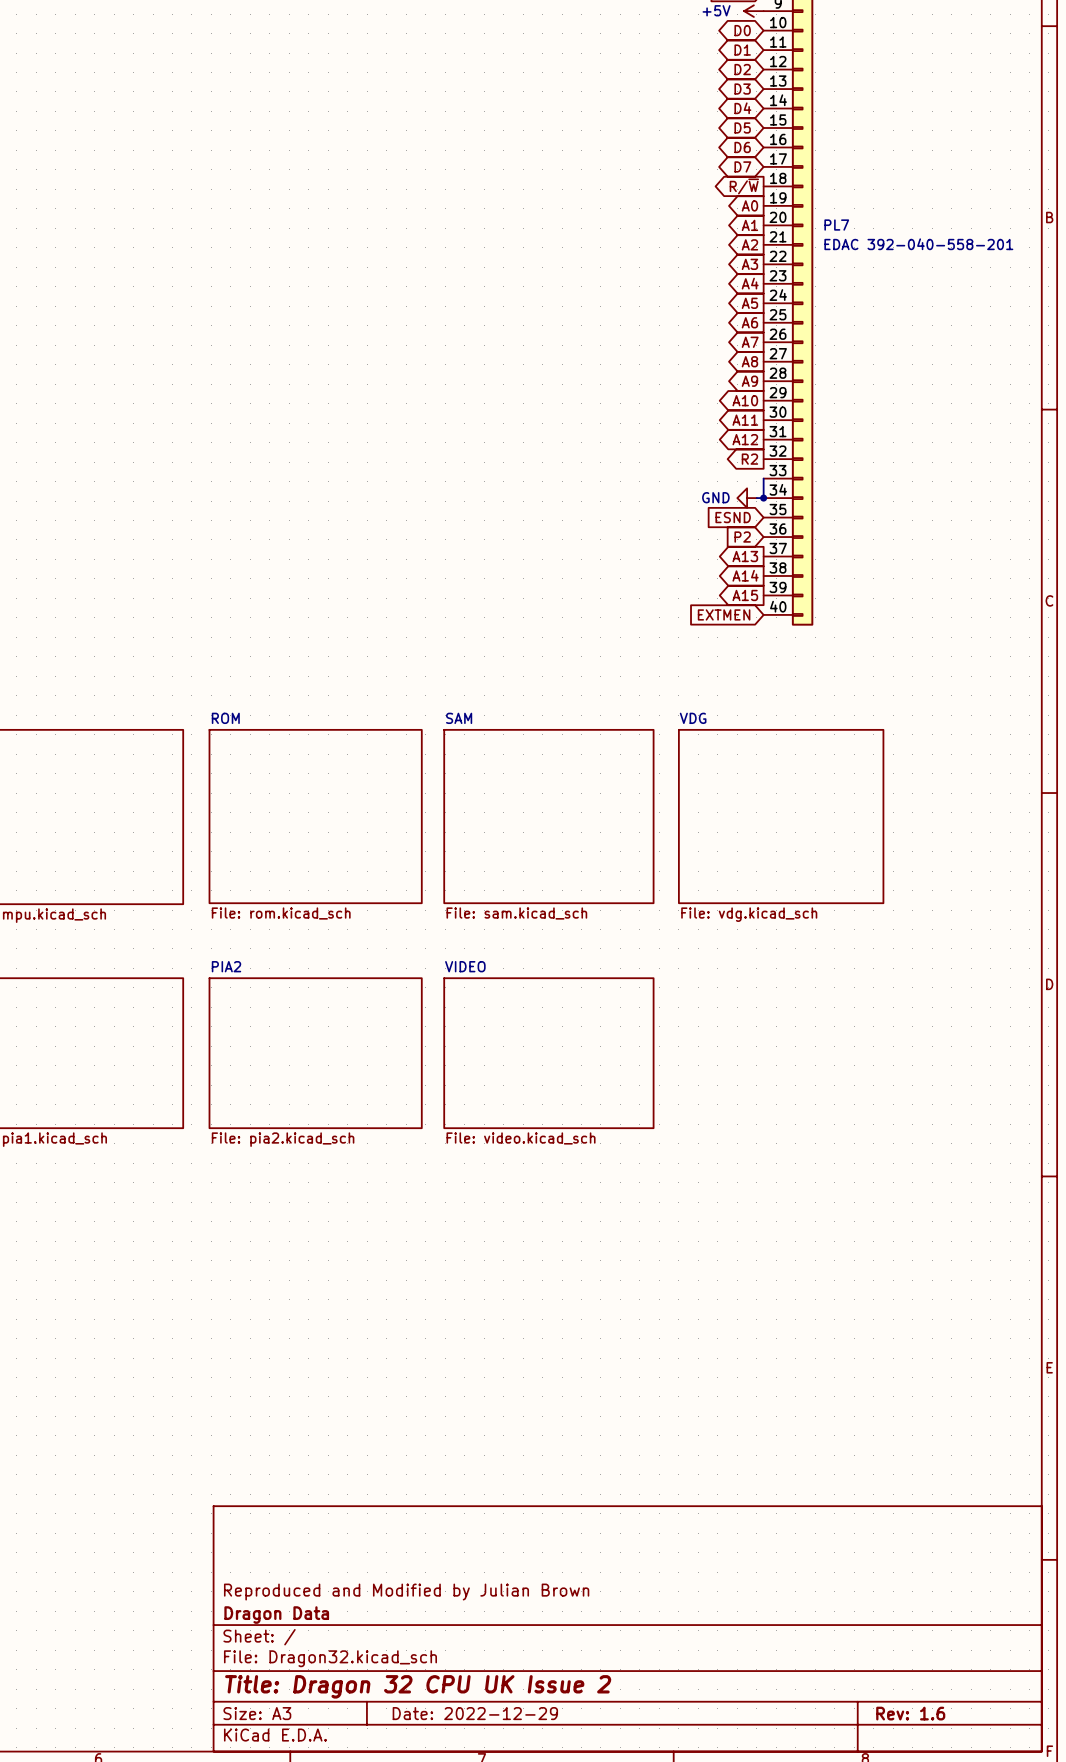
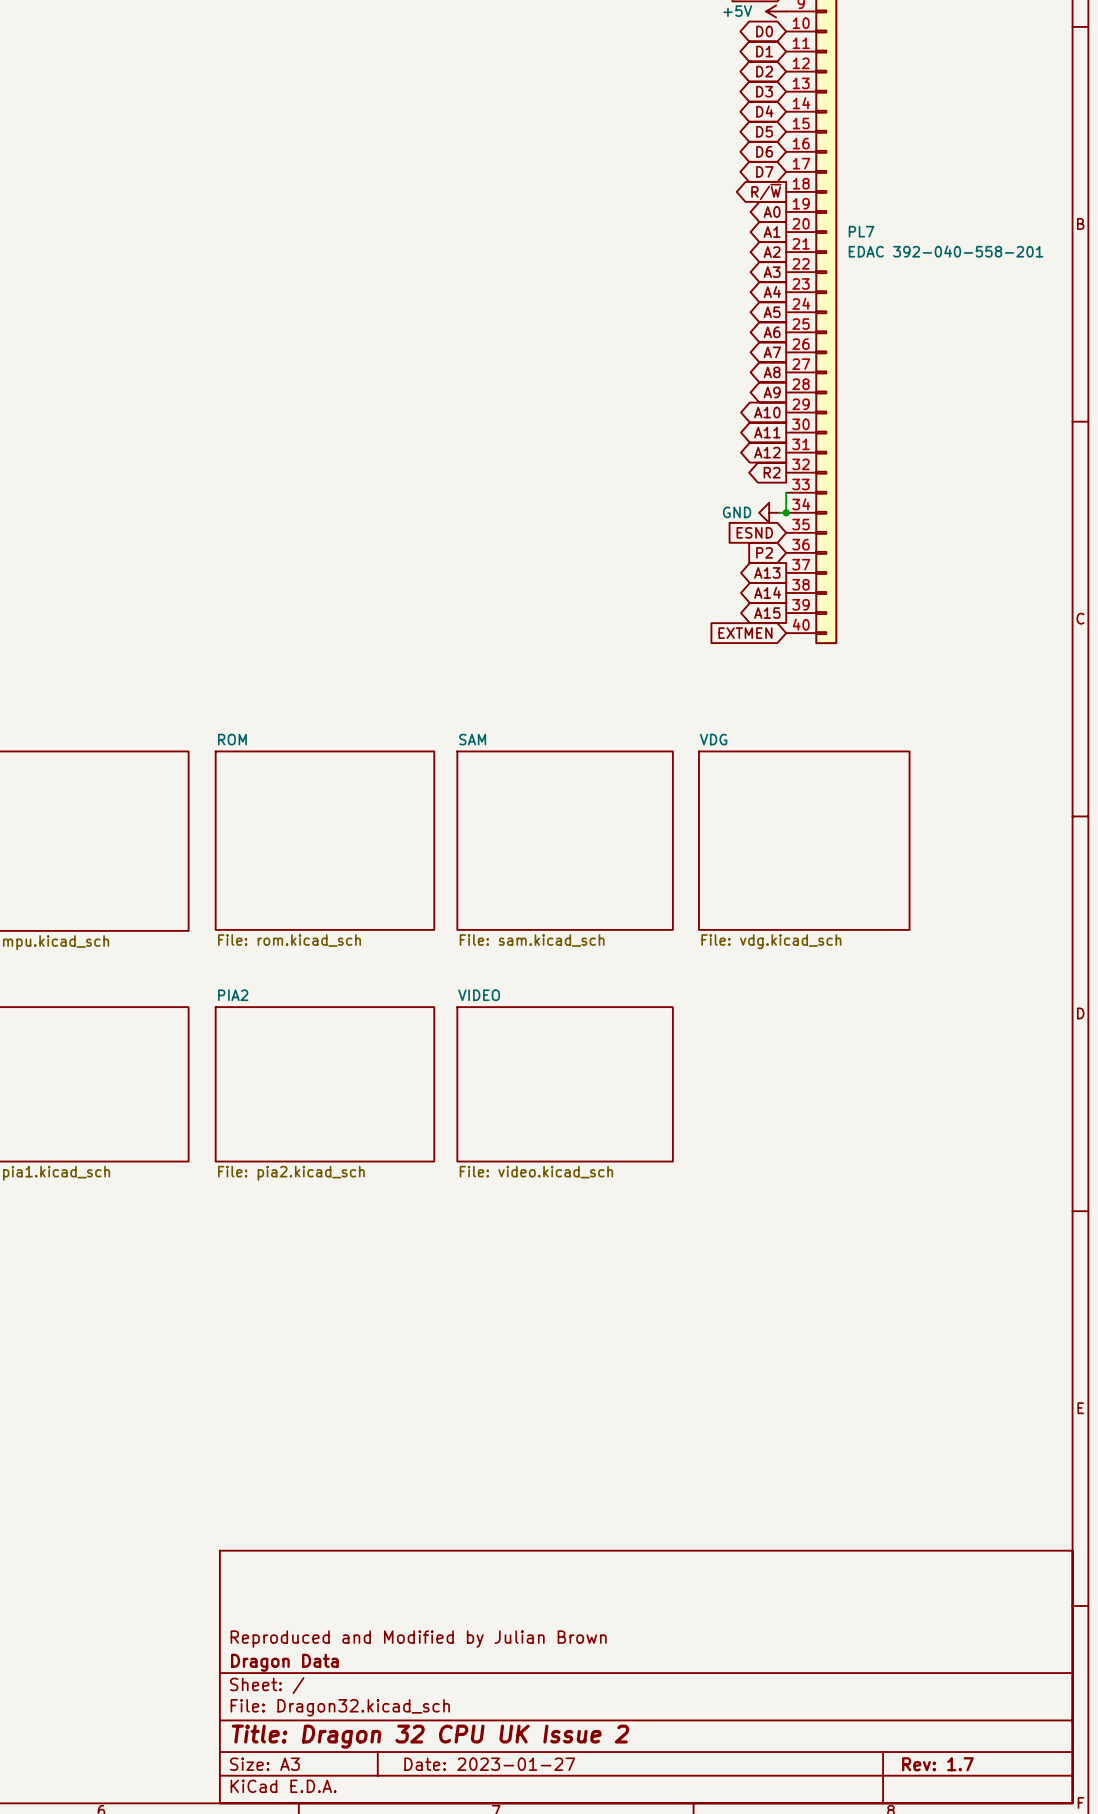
title block: Date: 2022-12-29 (475, 1713) -> Date: 2023-01-27 (489, 1764)
title block: Rev: 1.6 (910, 1713) -> Rev: 1.7 (937, 1764)

